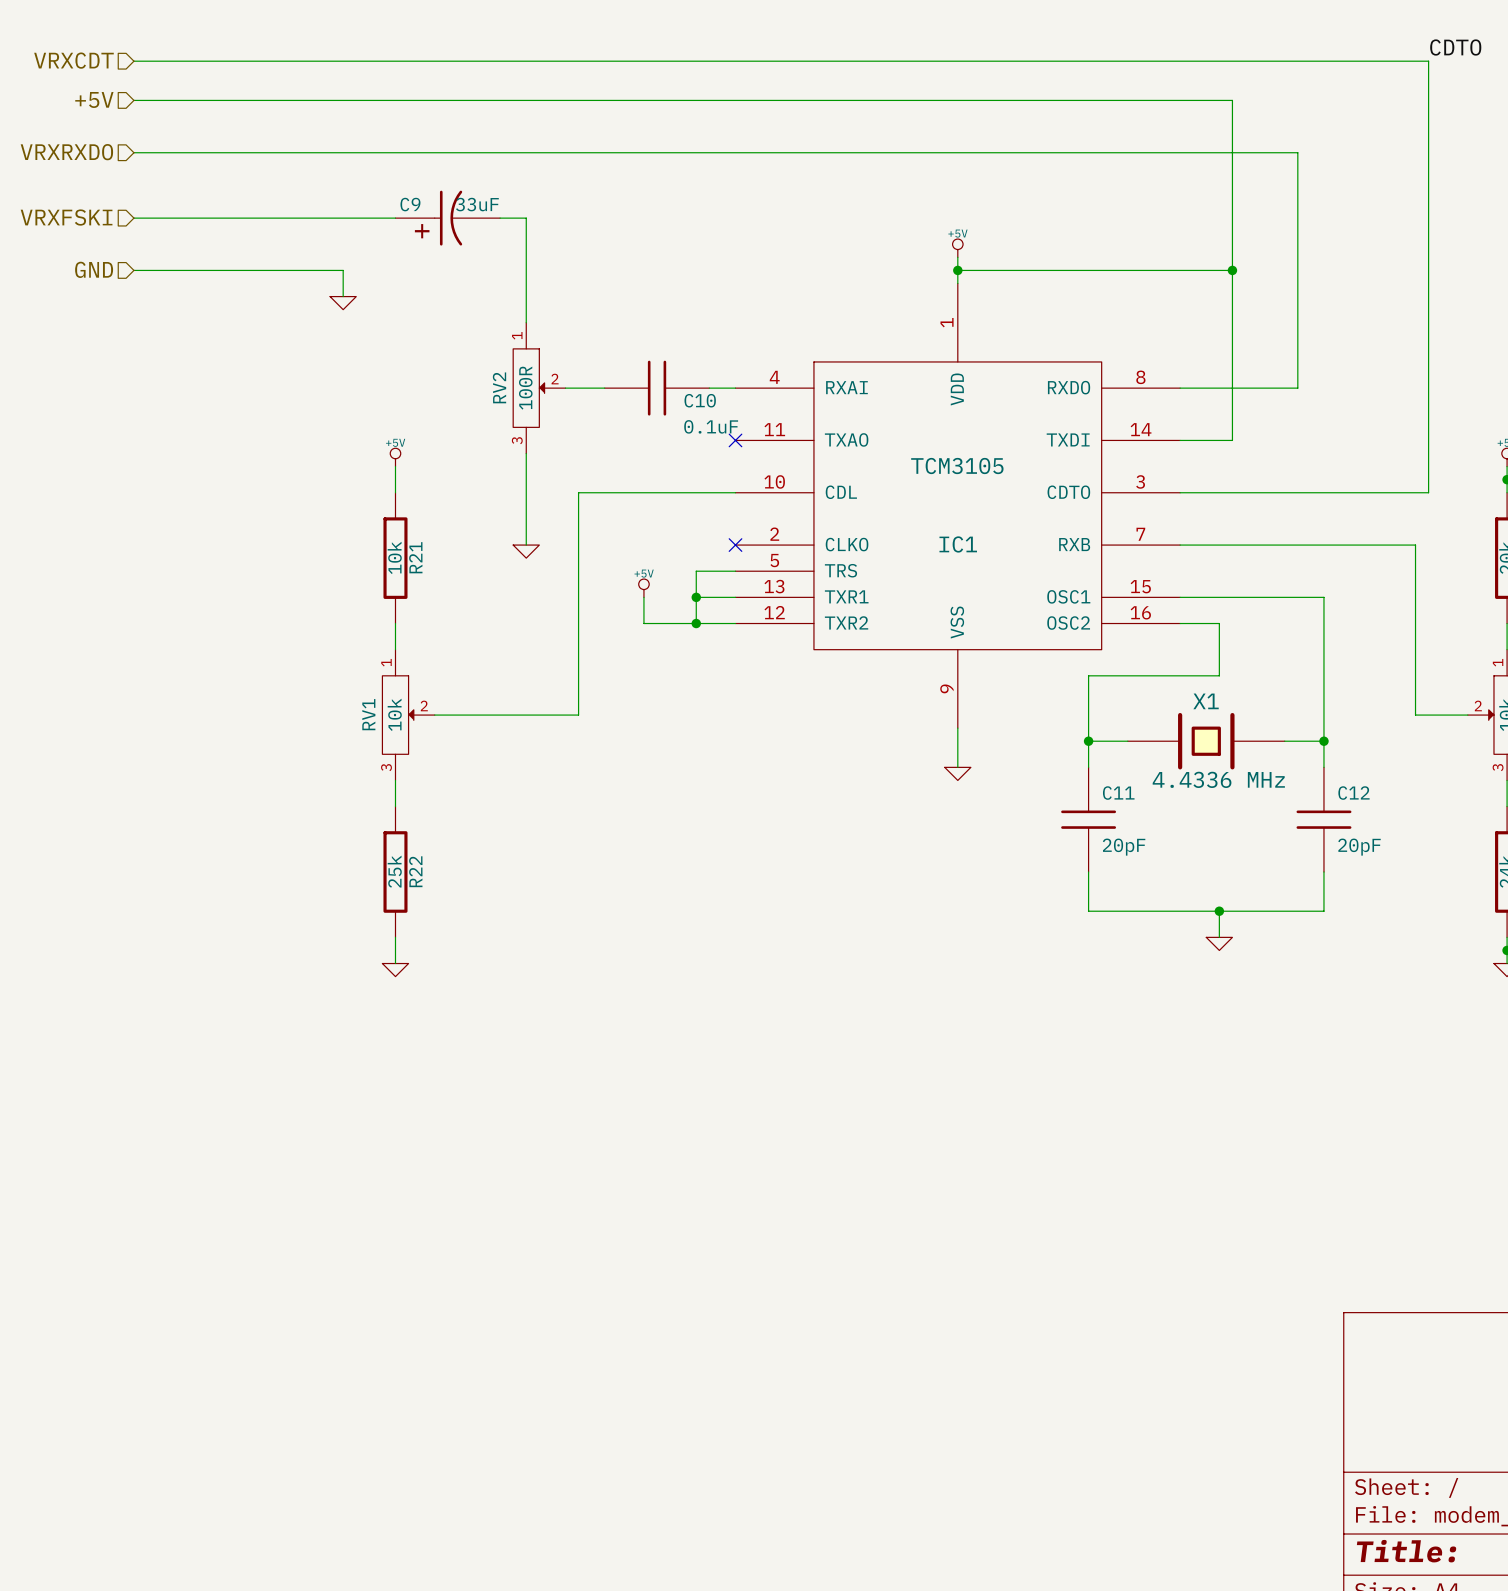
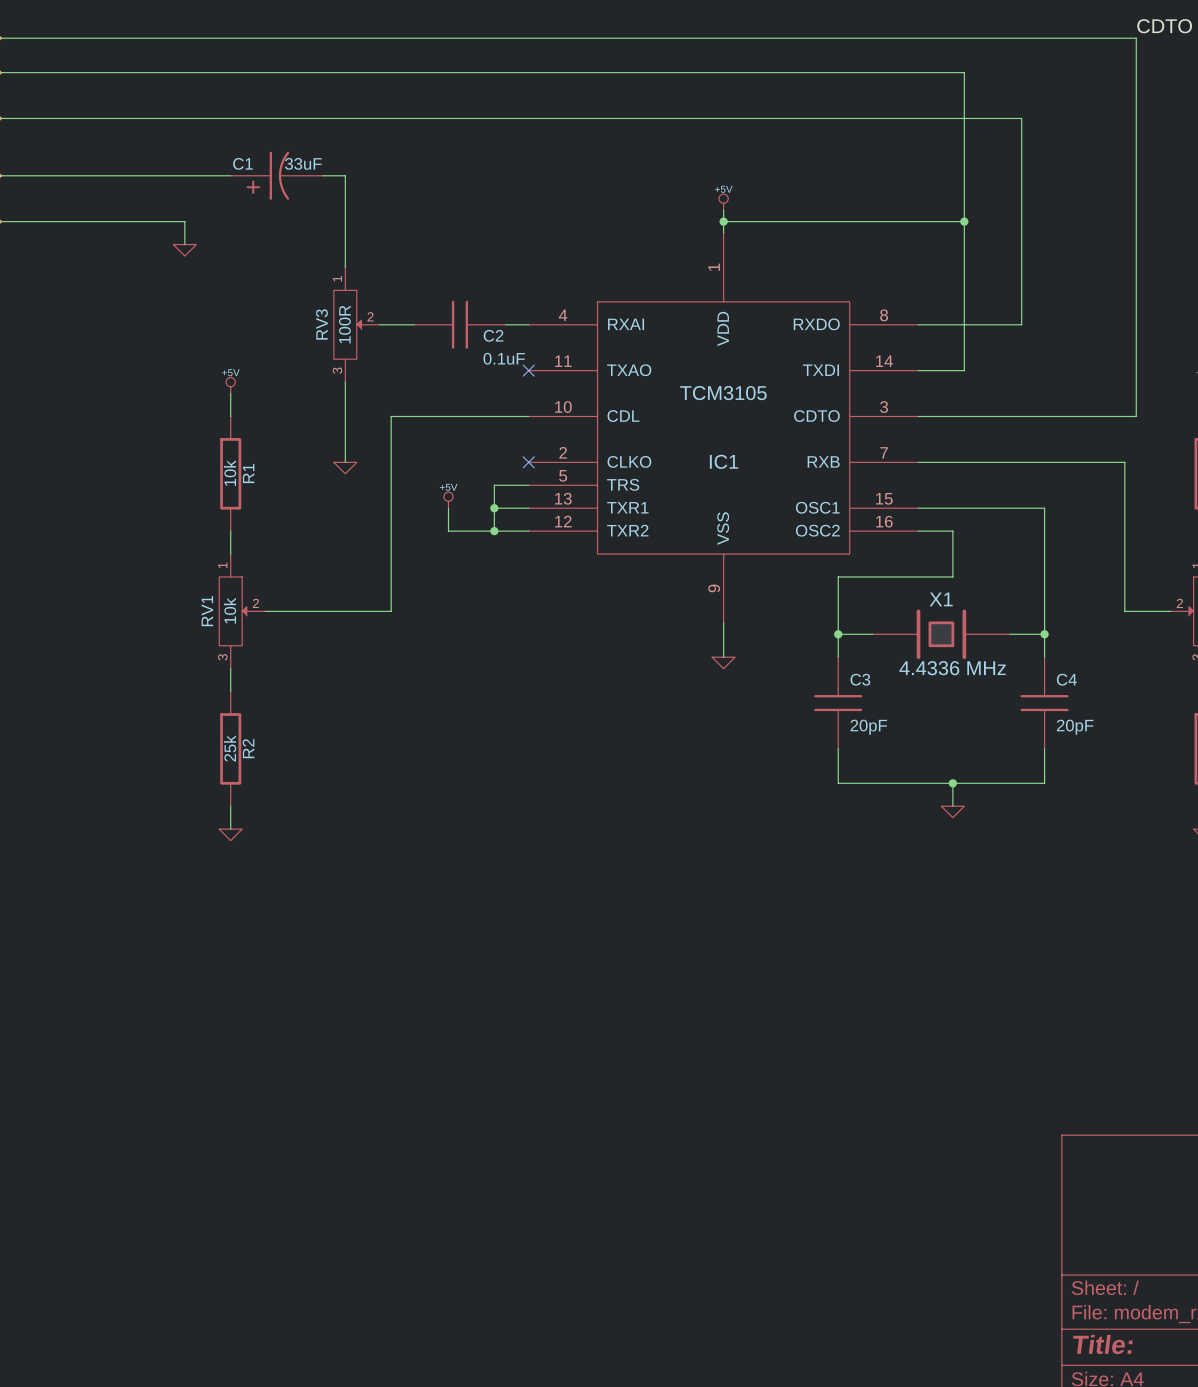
C9 name: C9 (410, 204) -> C1 (243, 163)
RV2 name: RV2 (499, 387) -> RV3 (321, 324)
C10 name: C10 (700, 400) -> C2 (493, 335)
R21 name: R21 (415, 557) -> R1 (248, 473)
C11 name: C11 (1118, 793) -> C3 (860, 679)
C12 name: C12 (1353, 793) -> C4 (1066, 679)
R22 name: R22 (415, 871) -> R2 (248, 748)

